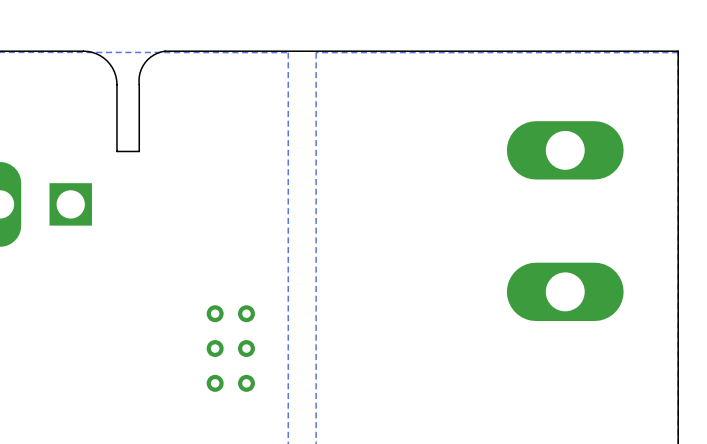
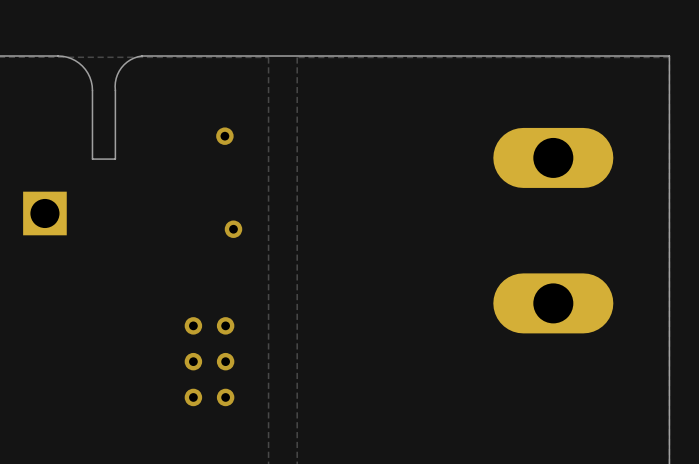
via: none -> (224, 136)
via: none -> (233, 229)

